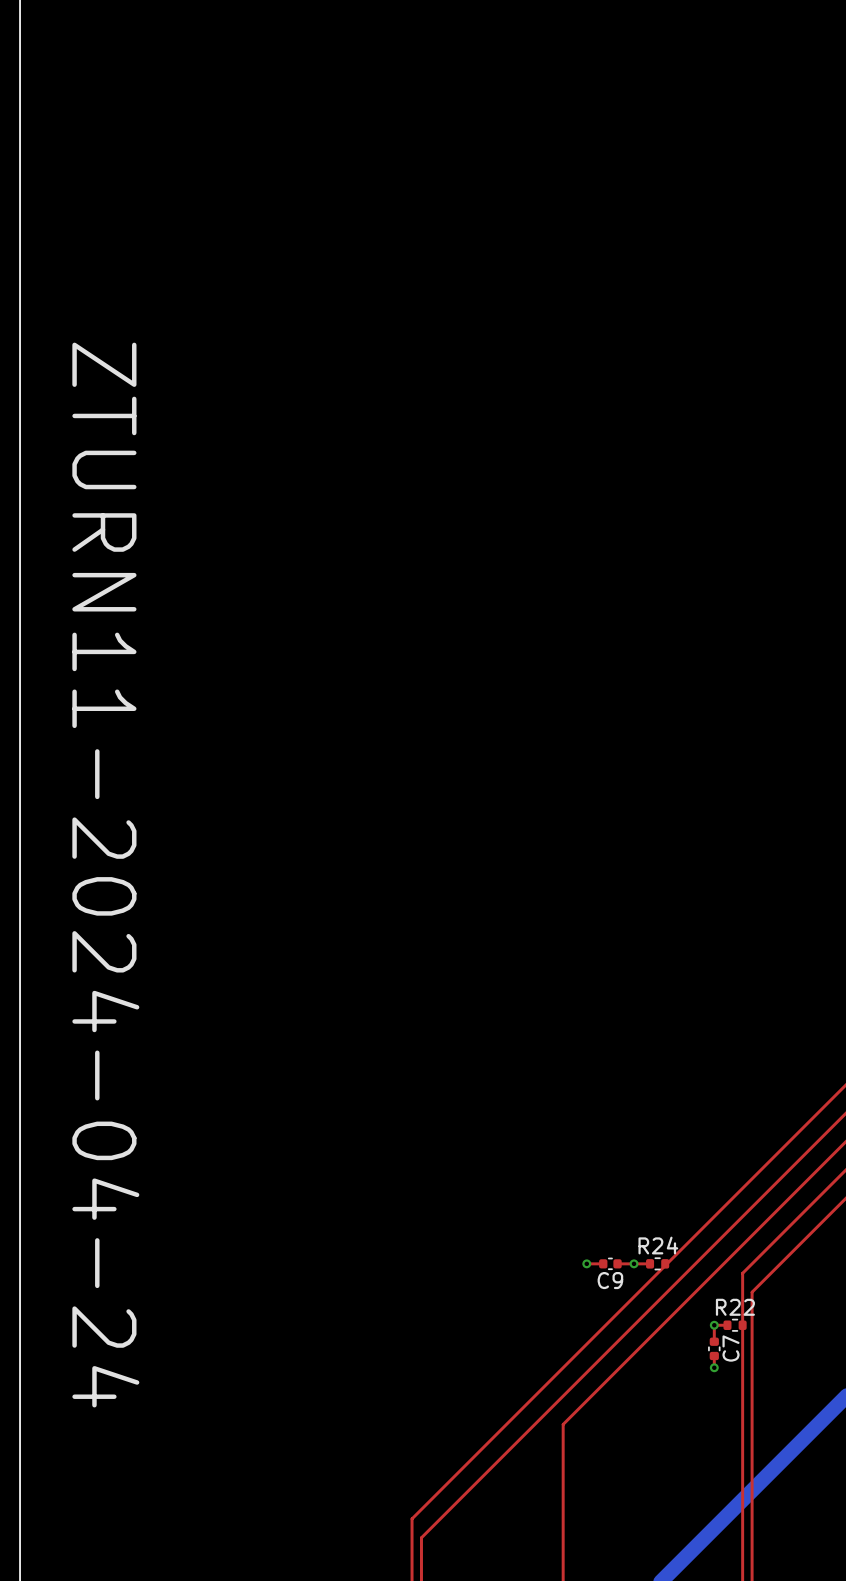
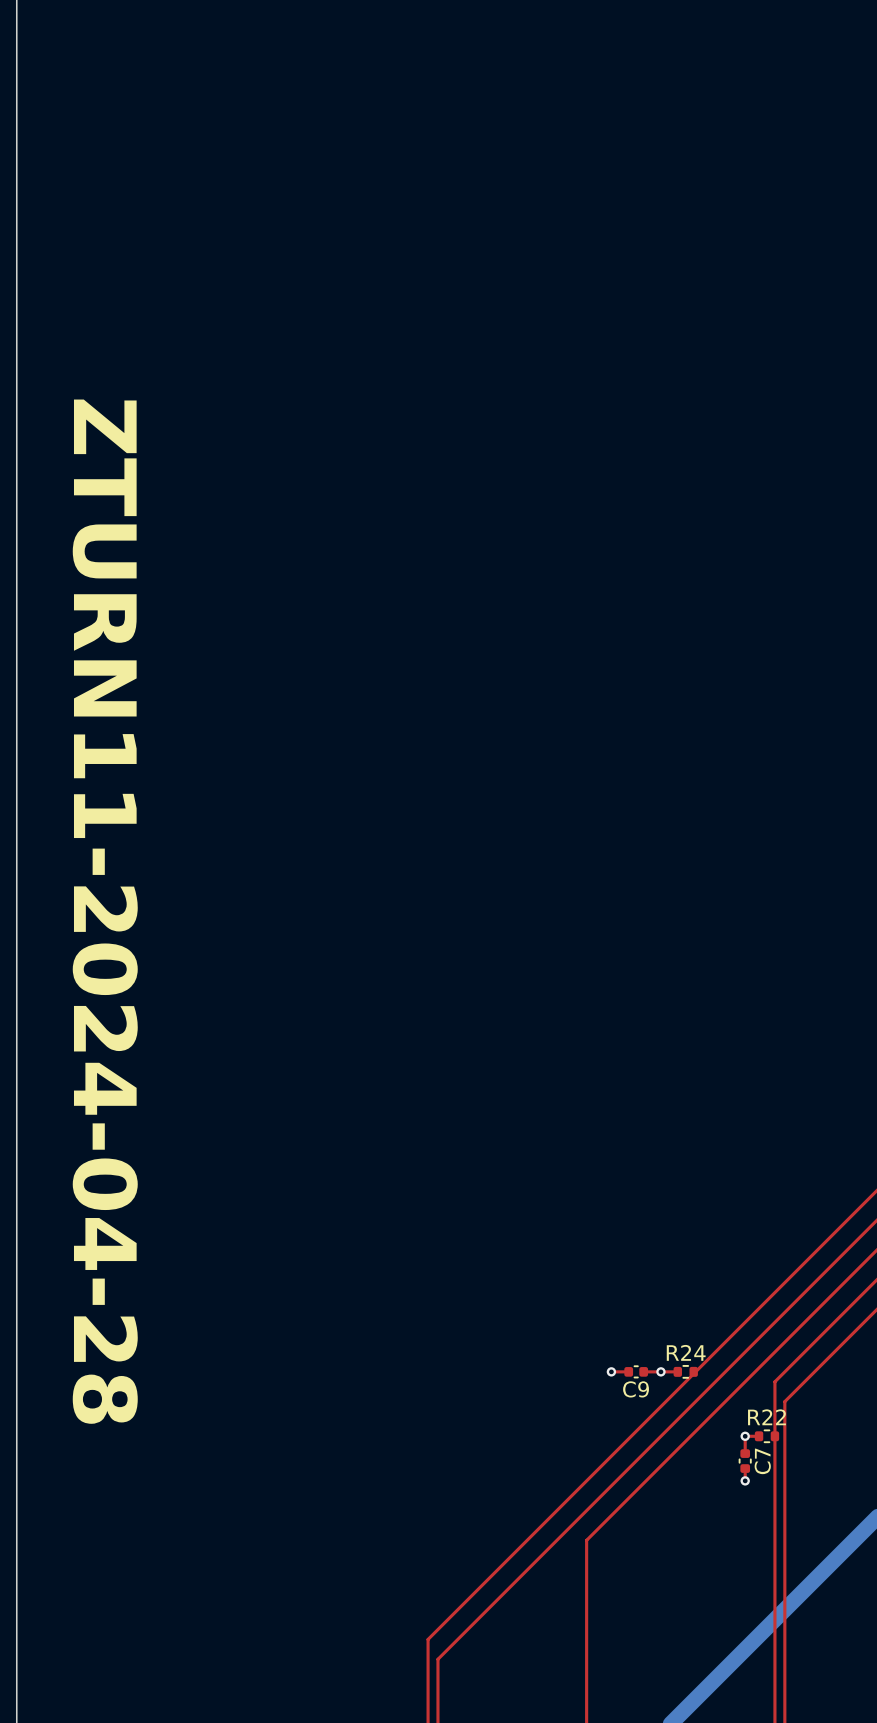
text: ZTURN11-2024-04-24 (105, 875) -> ZTURN11-2024-04-28 (105, 911)

